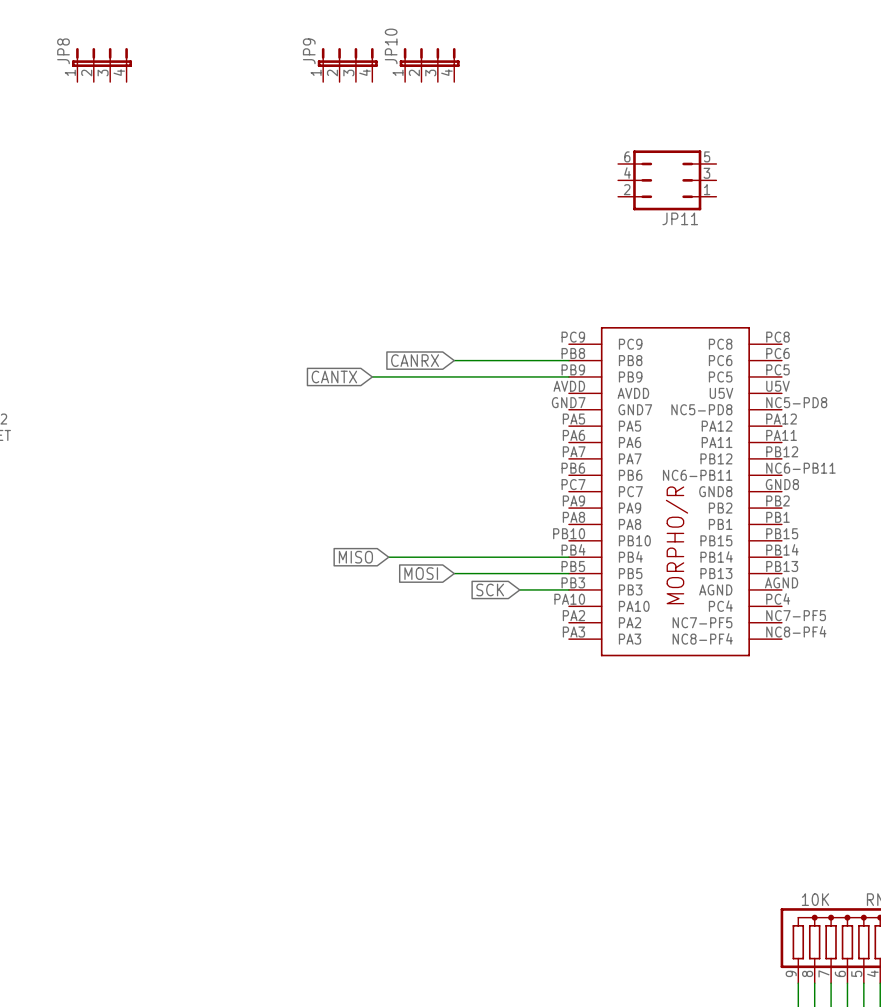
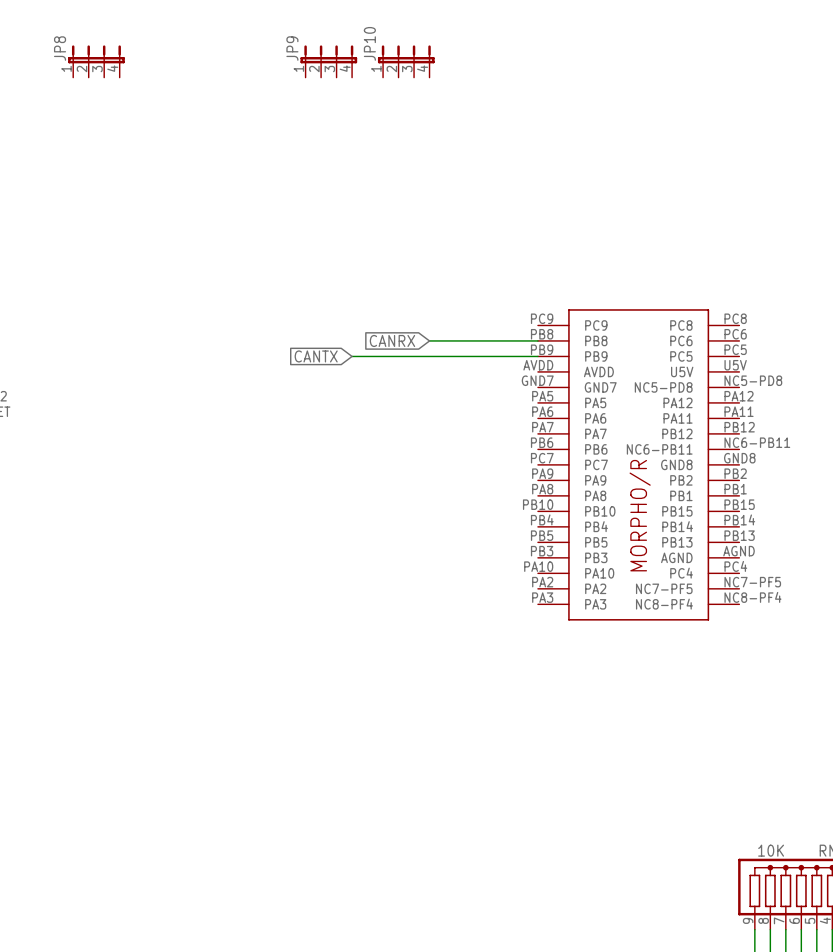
JP11: (667, 180) -> none
global label: MISO (355, 557) -> none
wire: (388, 557) (568, 557) -> none
global label: MOSI (421, 573) -> none
wire: (454, 573) (568, 573) -> none
global label: SCK (490, 589) -> none
wire: (519, 589) (568, 589) -> none

